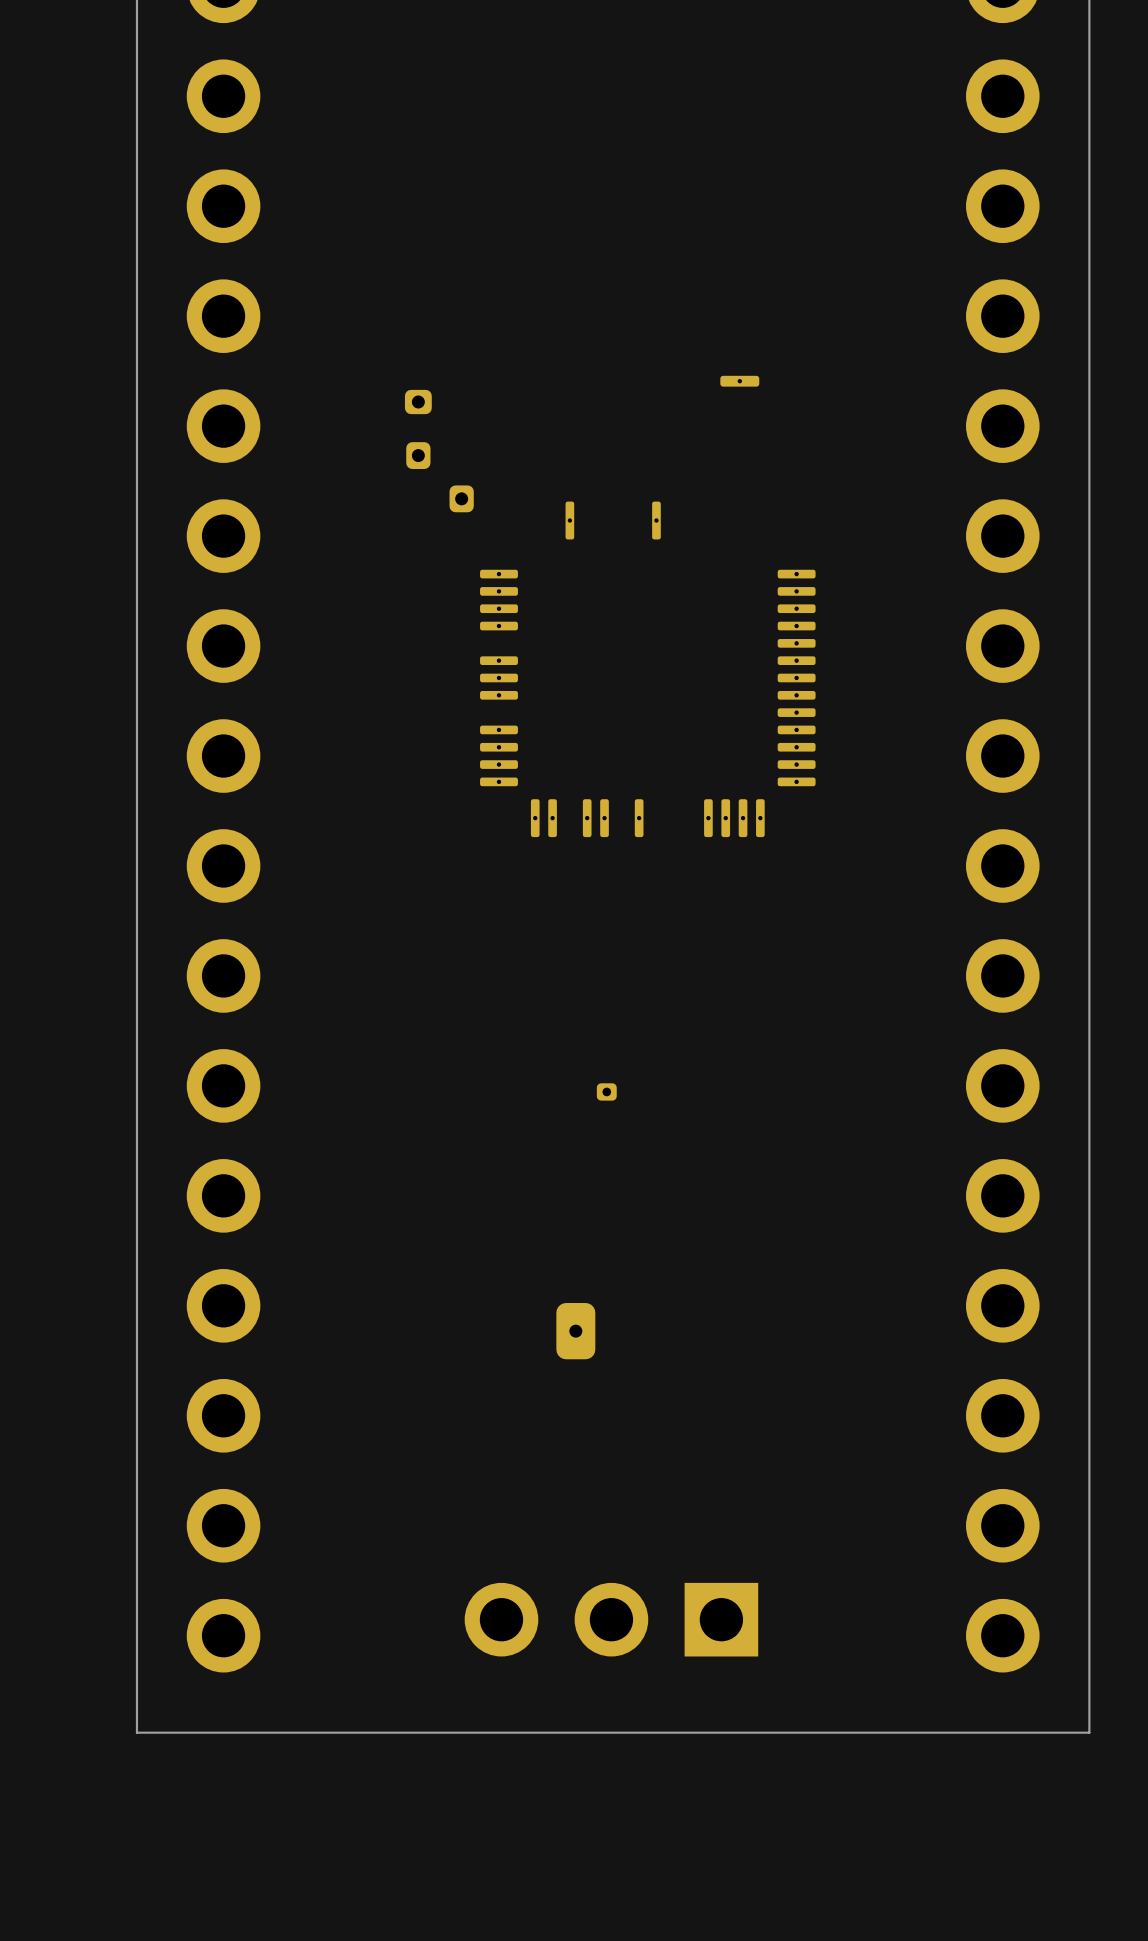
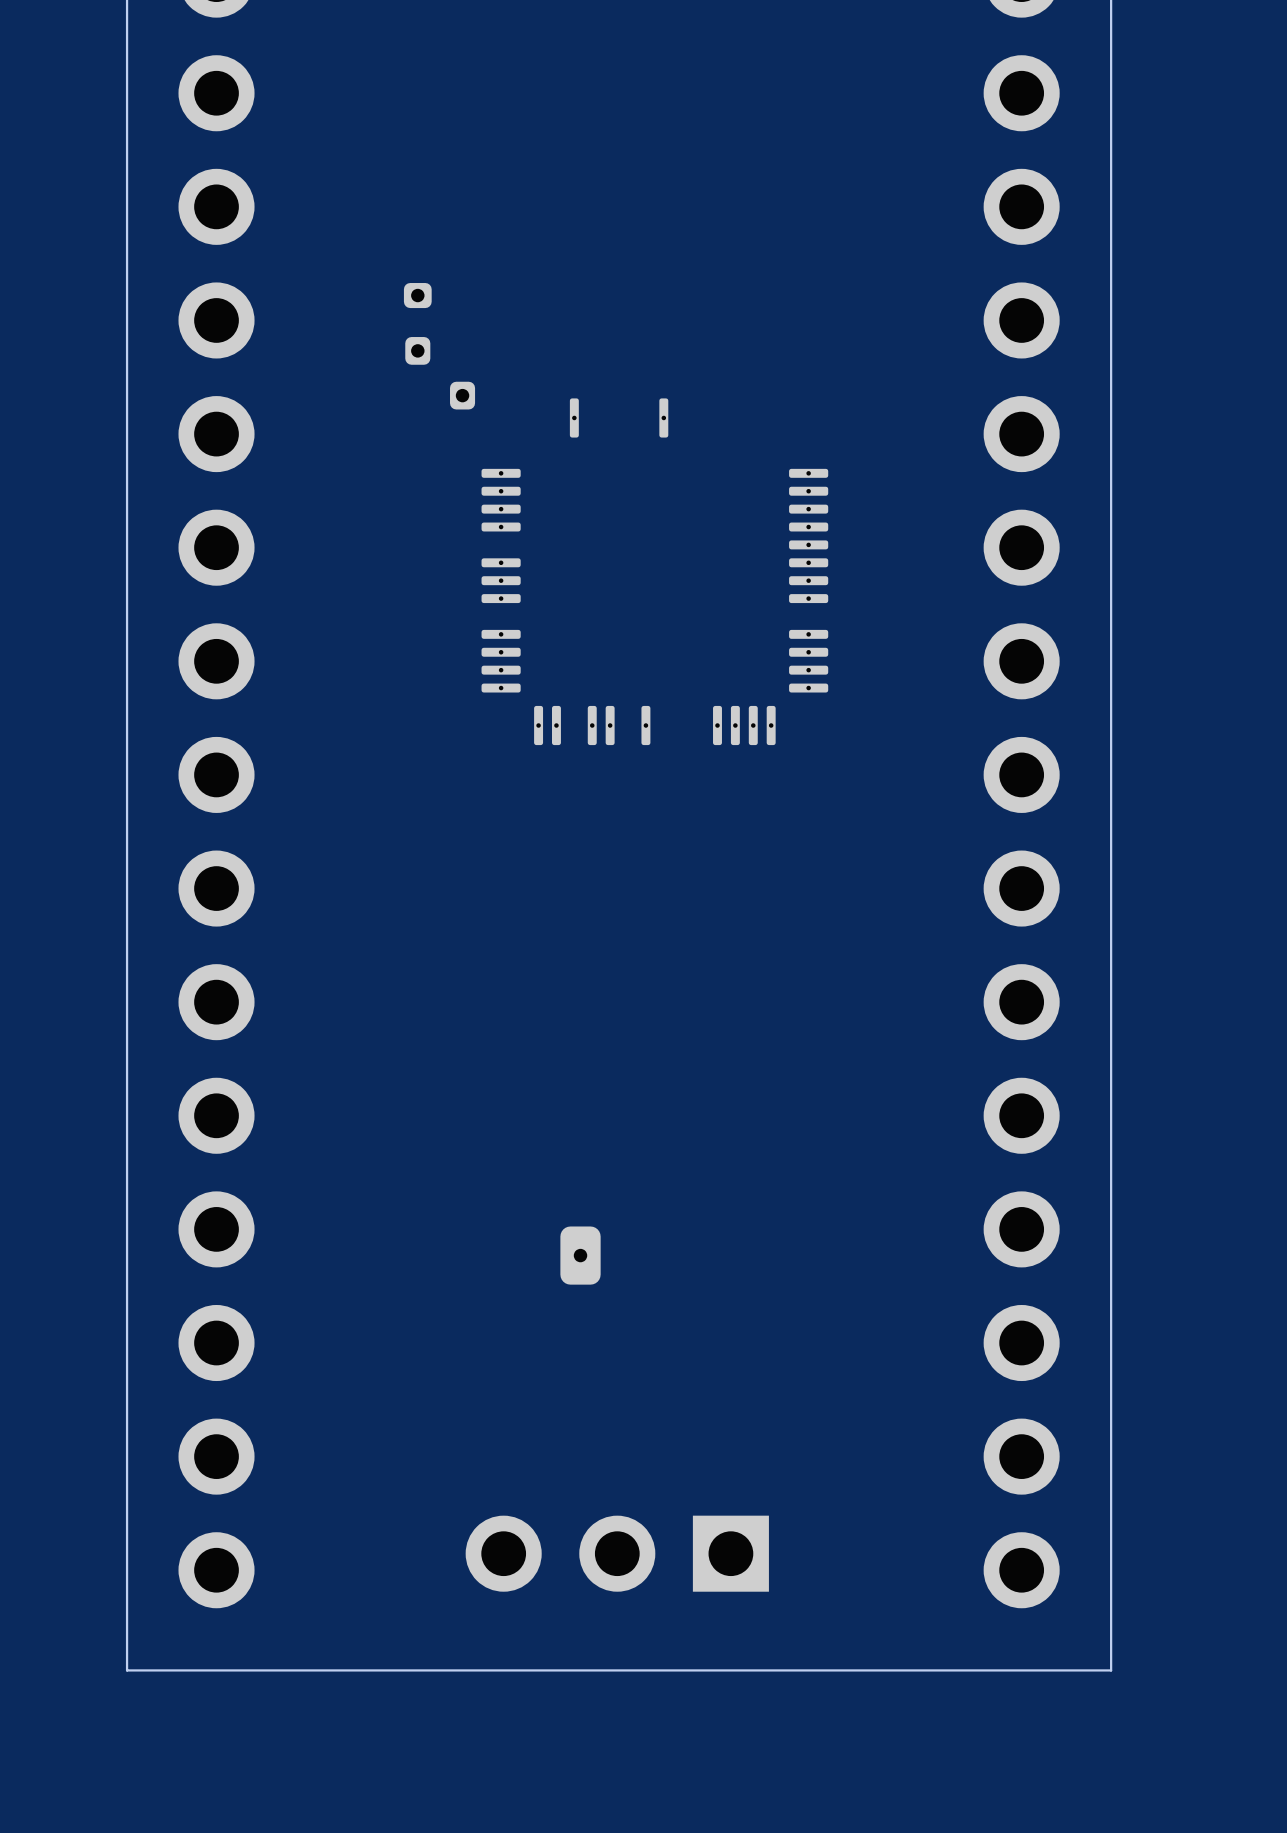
part: (739, 381) -> none
part footprint: [480, 501, 816, 838] -> [481, 398, 829, 746]
part: (606, 1091) -> none

